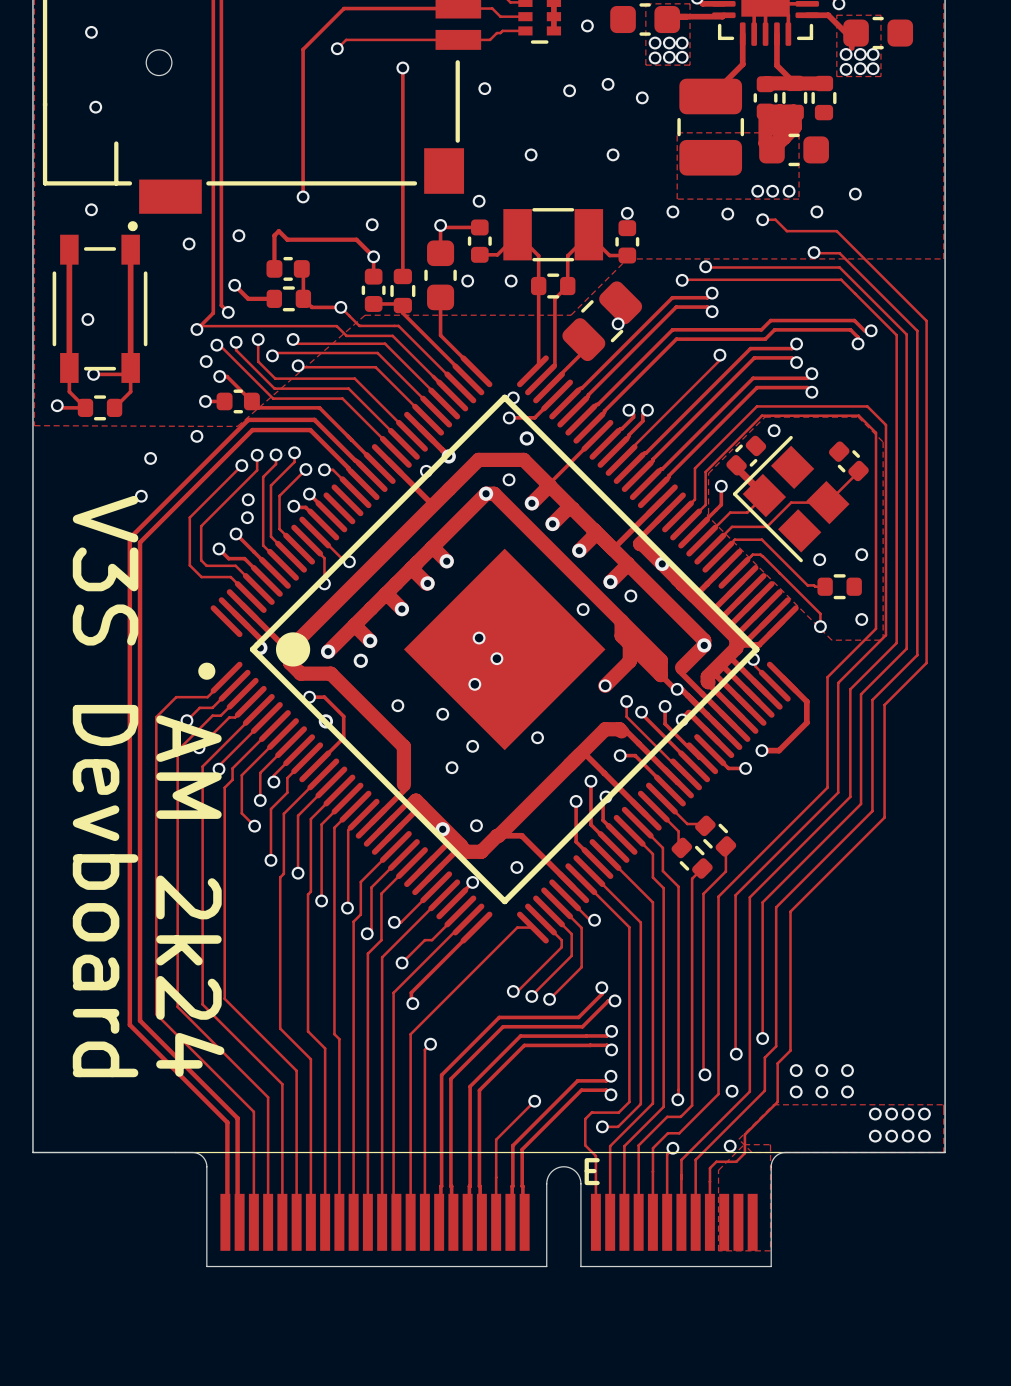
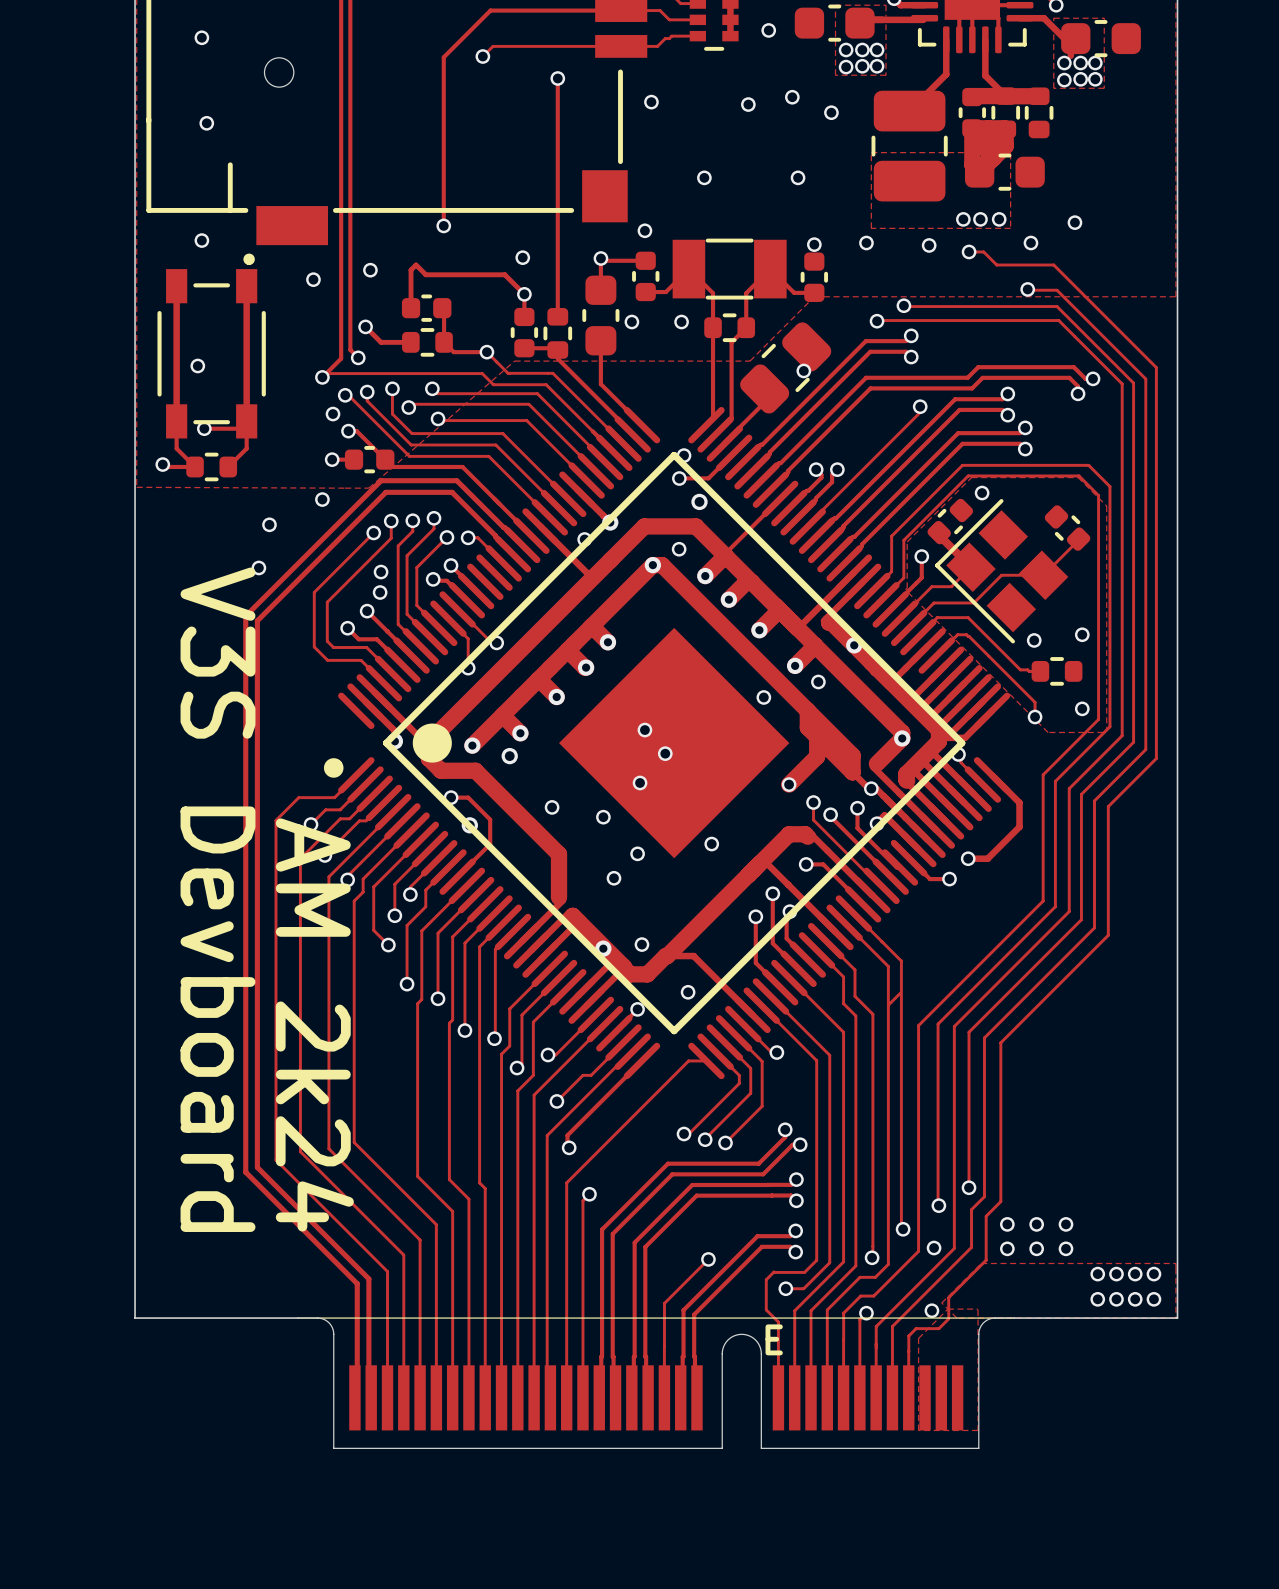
track: (687, 824) (700, 824) -> none
track: (678, 831) (678, 847) -> (872, 951) (888, 966) (888, 1005)
part: (715, 836) -> none
track: (725, 846) (725, 871) (703, 893) -> (882, 942) (901, 961) (901, 1022)
part: (692, 858) -> none

